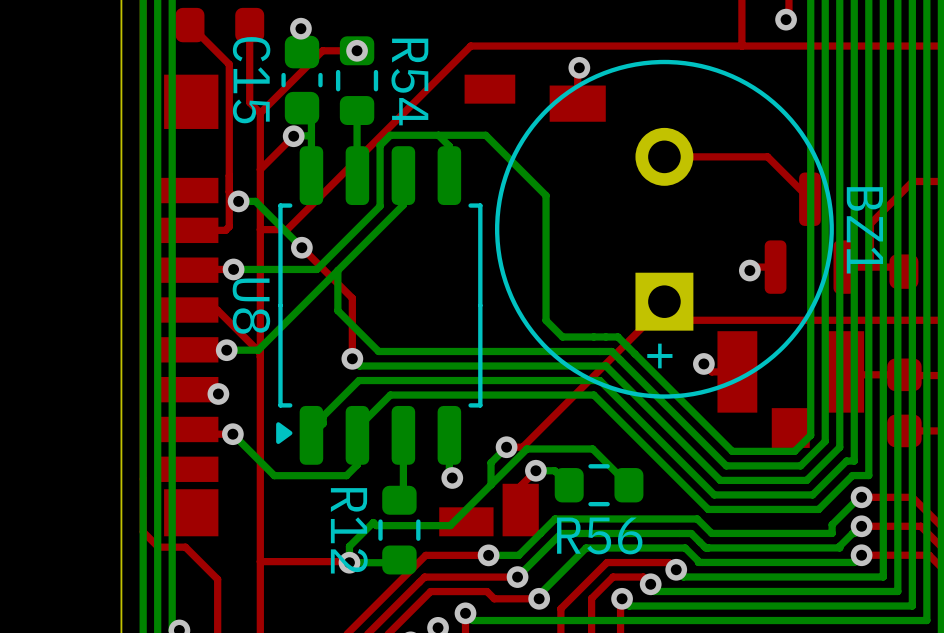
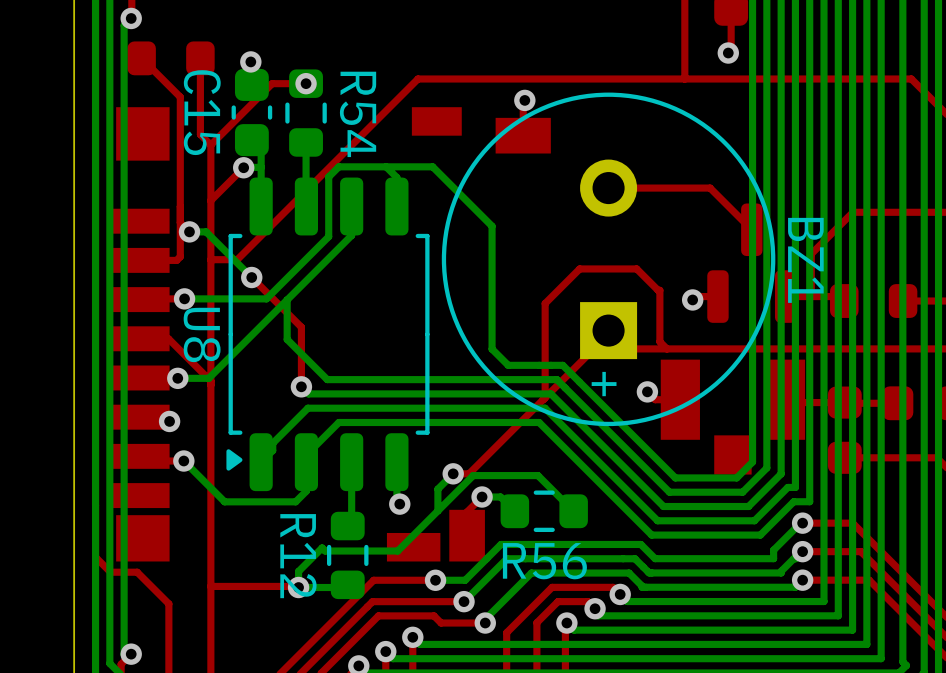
top track: none -> (667, 348) (659, 341) (659, 290) (636, 268) (579, 268) (545, 303) (545, 397)

